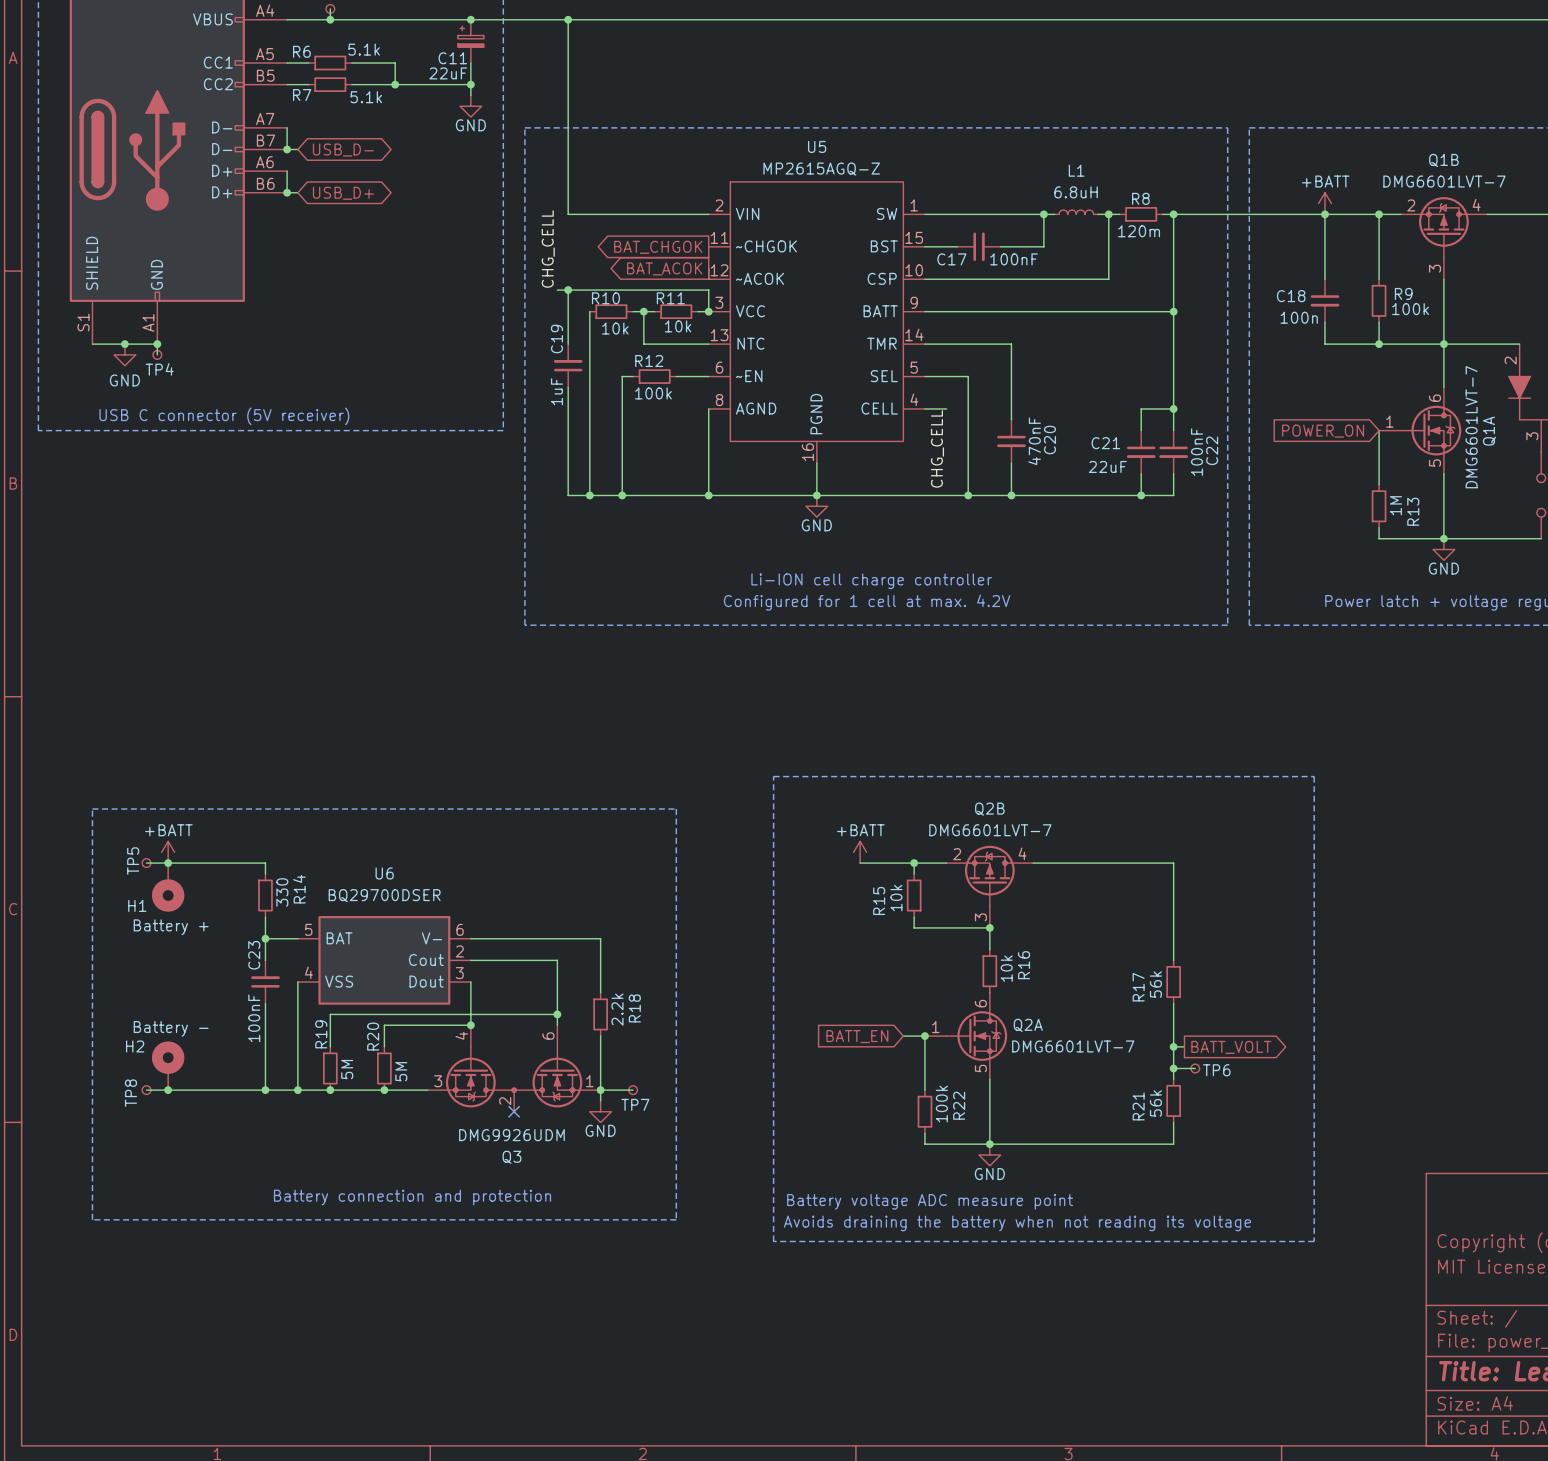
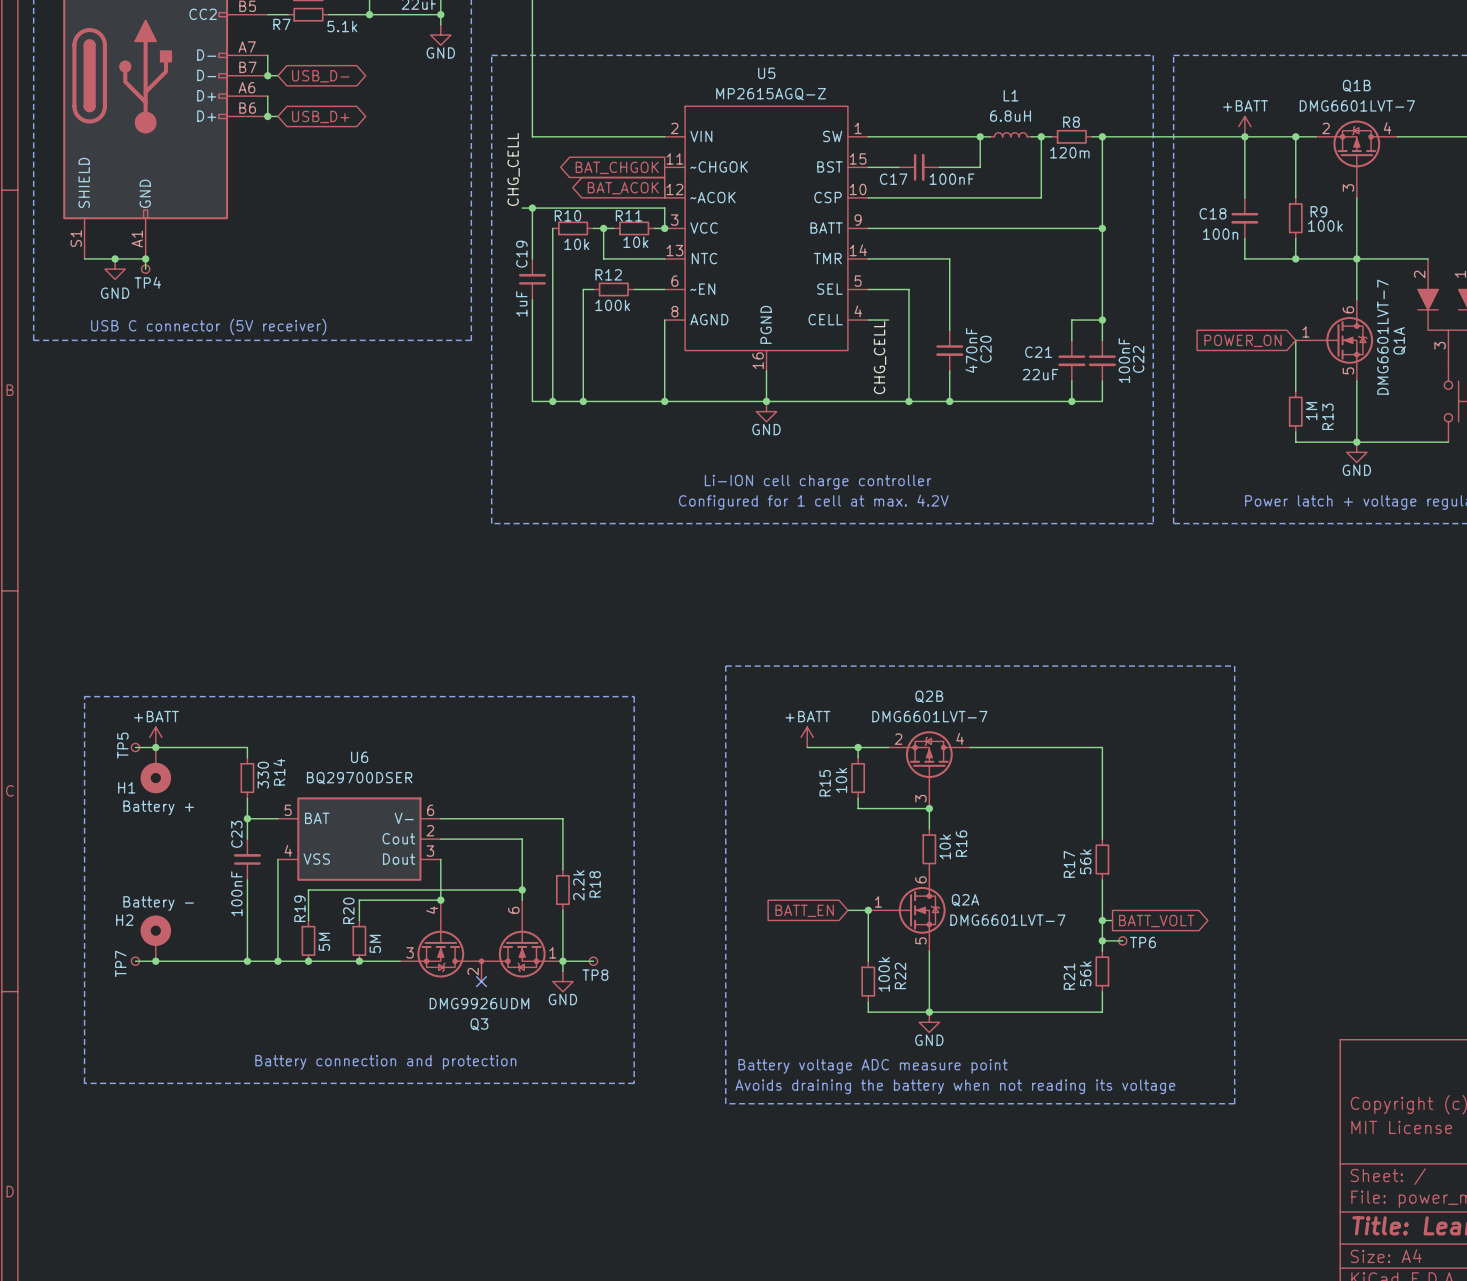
TP8 name: TP8 (130, 1093) -> TP7 (120, 963)
TP7 name: TP7 (635, 1104) -> TP8 (595, 975)

